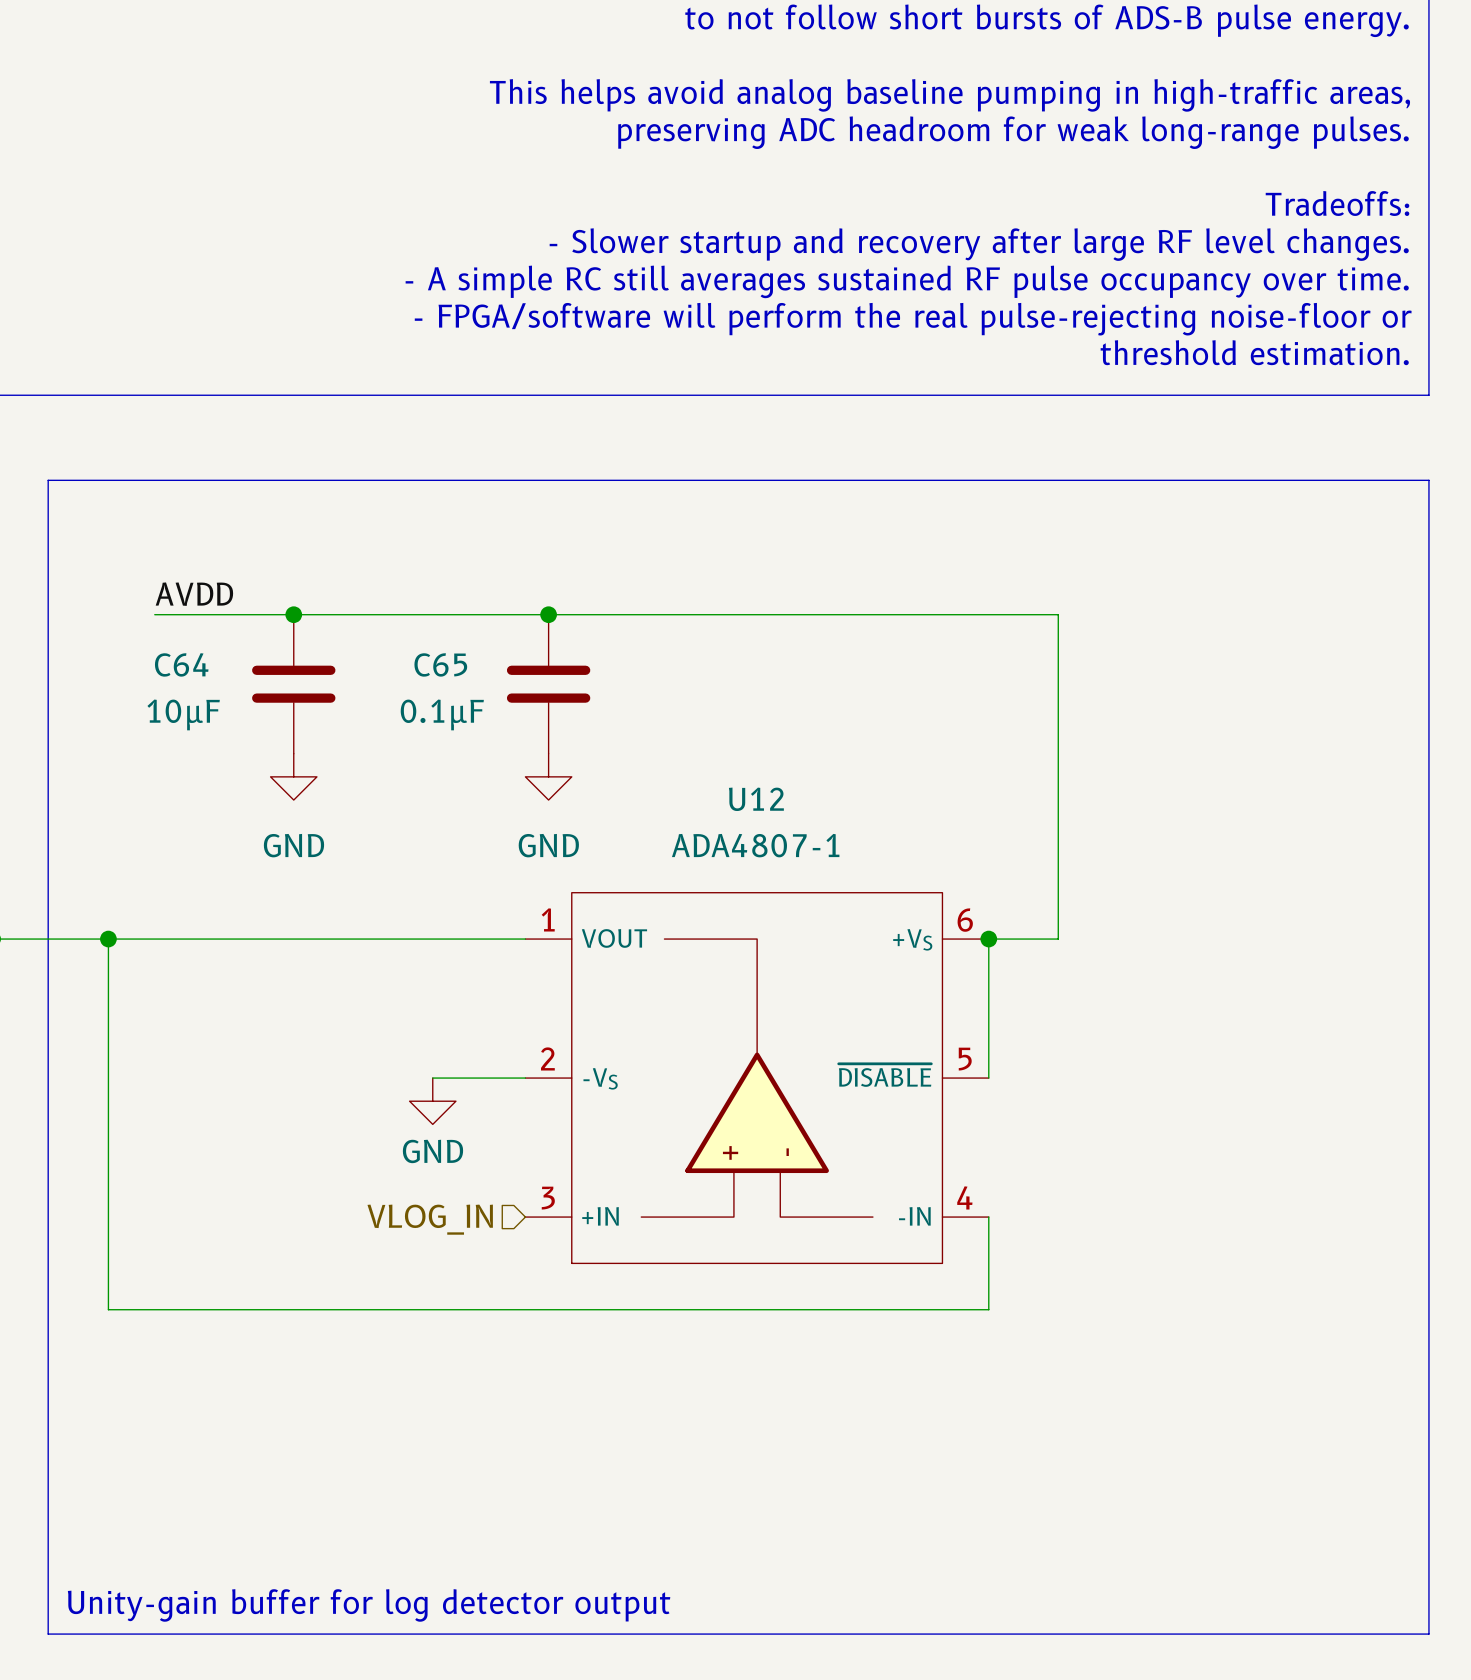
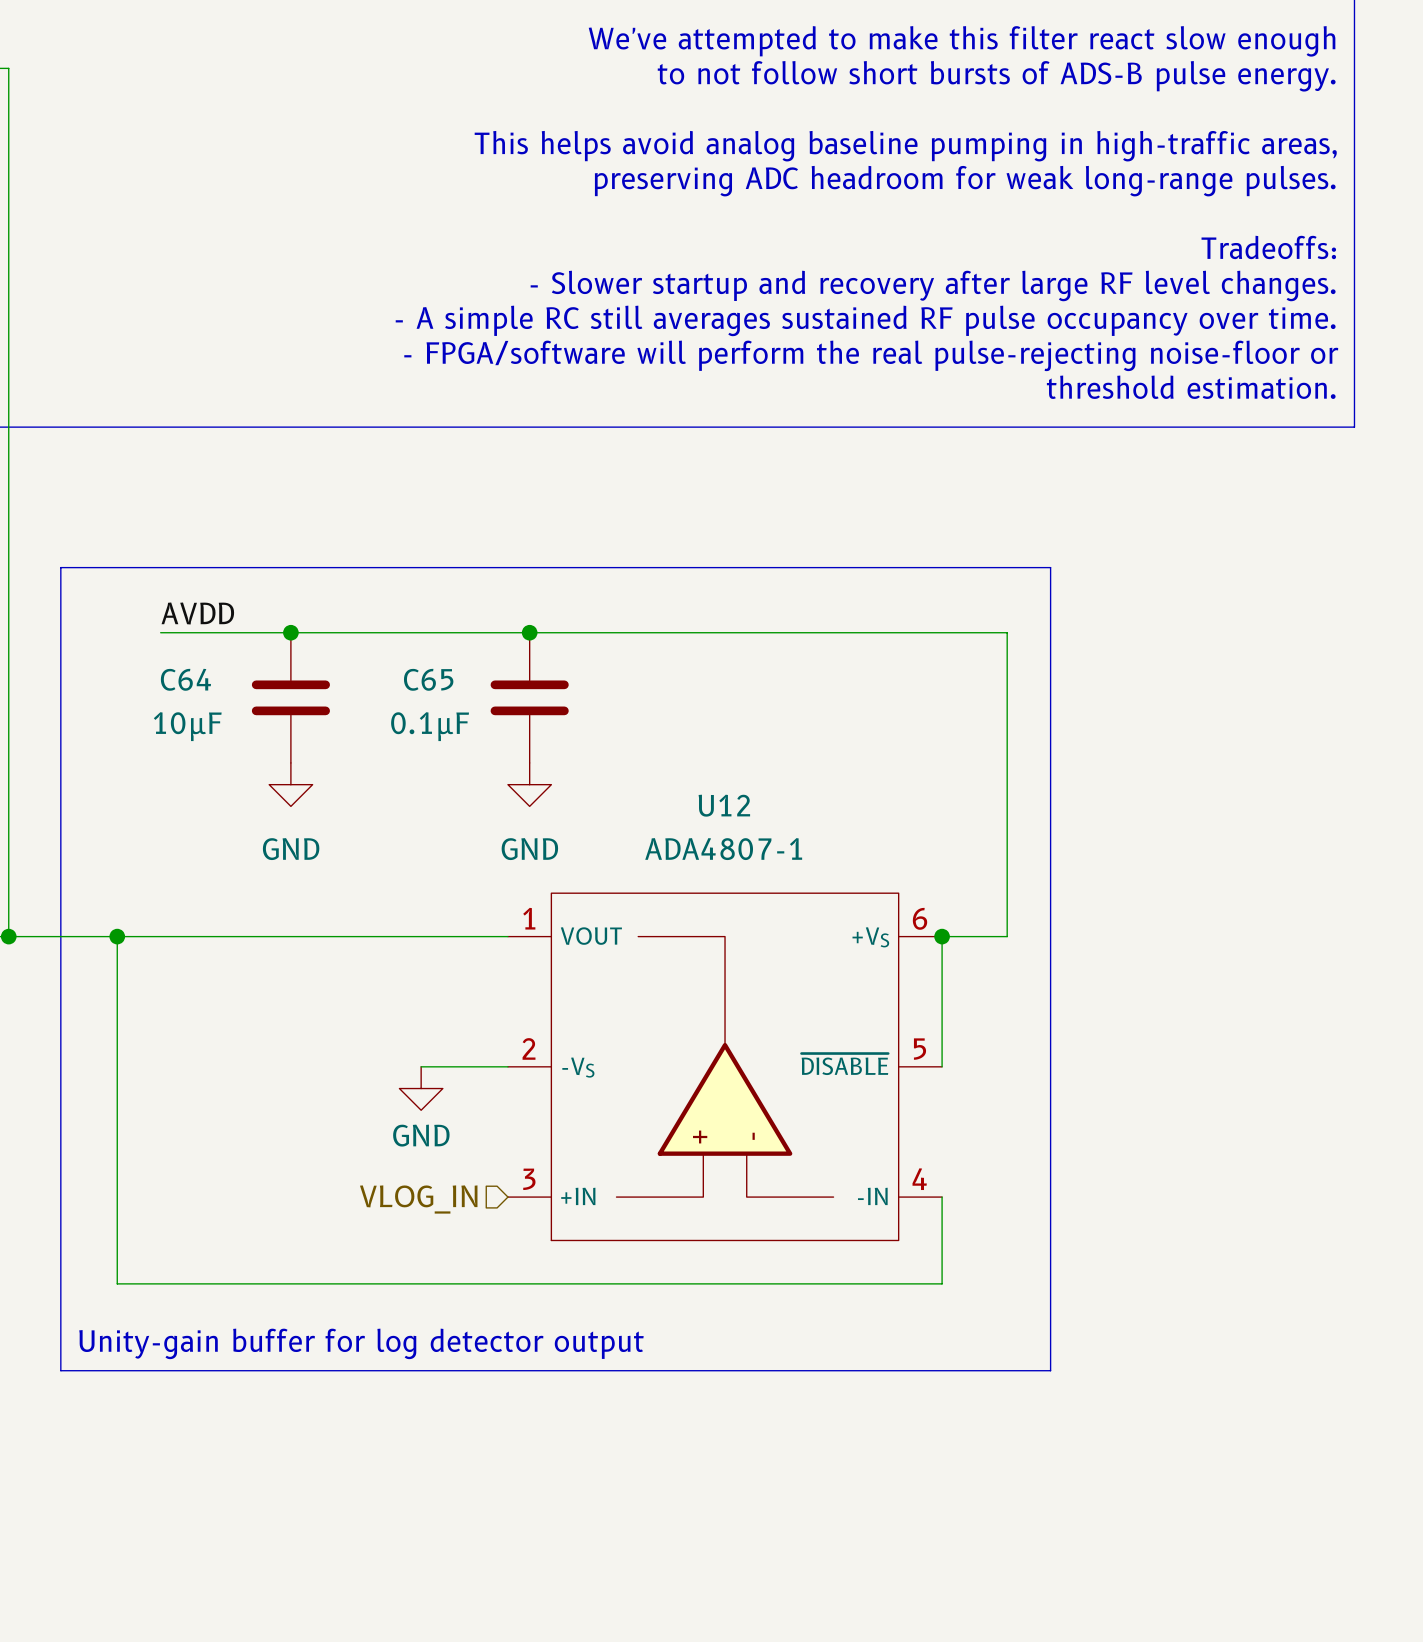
line: (48, 545) (48, 480) (1428, 480) (1428, 1634) (48, 1634) (48, 1402) -> (60, 567) (1050, 567) (1050, 1370) (60, 1370)
text position: Unity-gain buffer for log detector output (369, 1605) -> Unity-gain buffer for log detector output (361, 1343)

